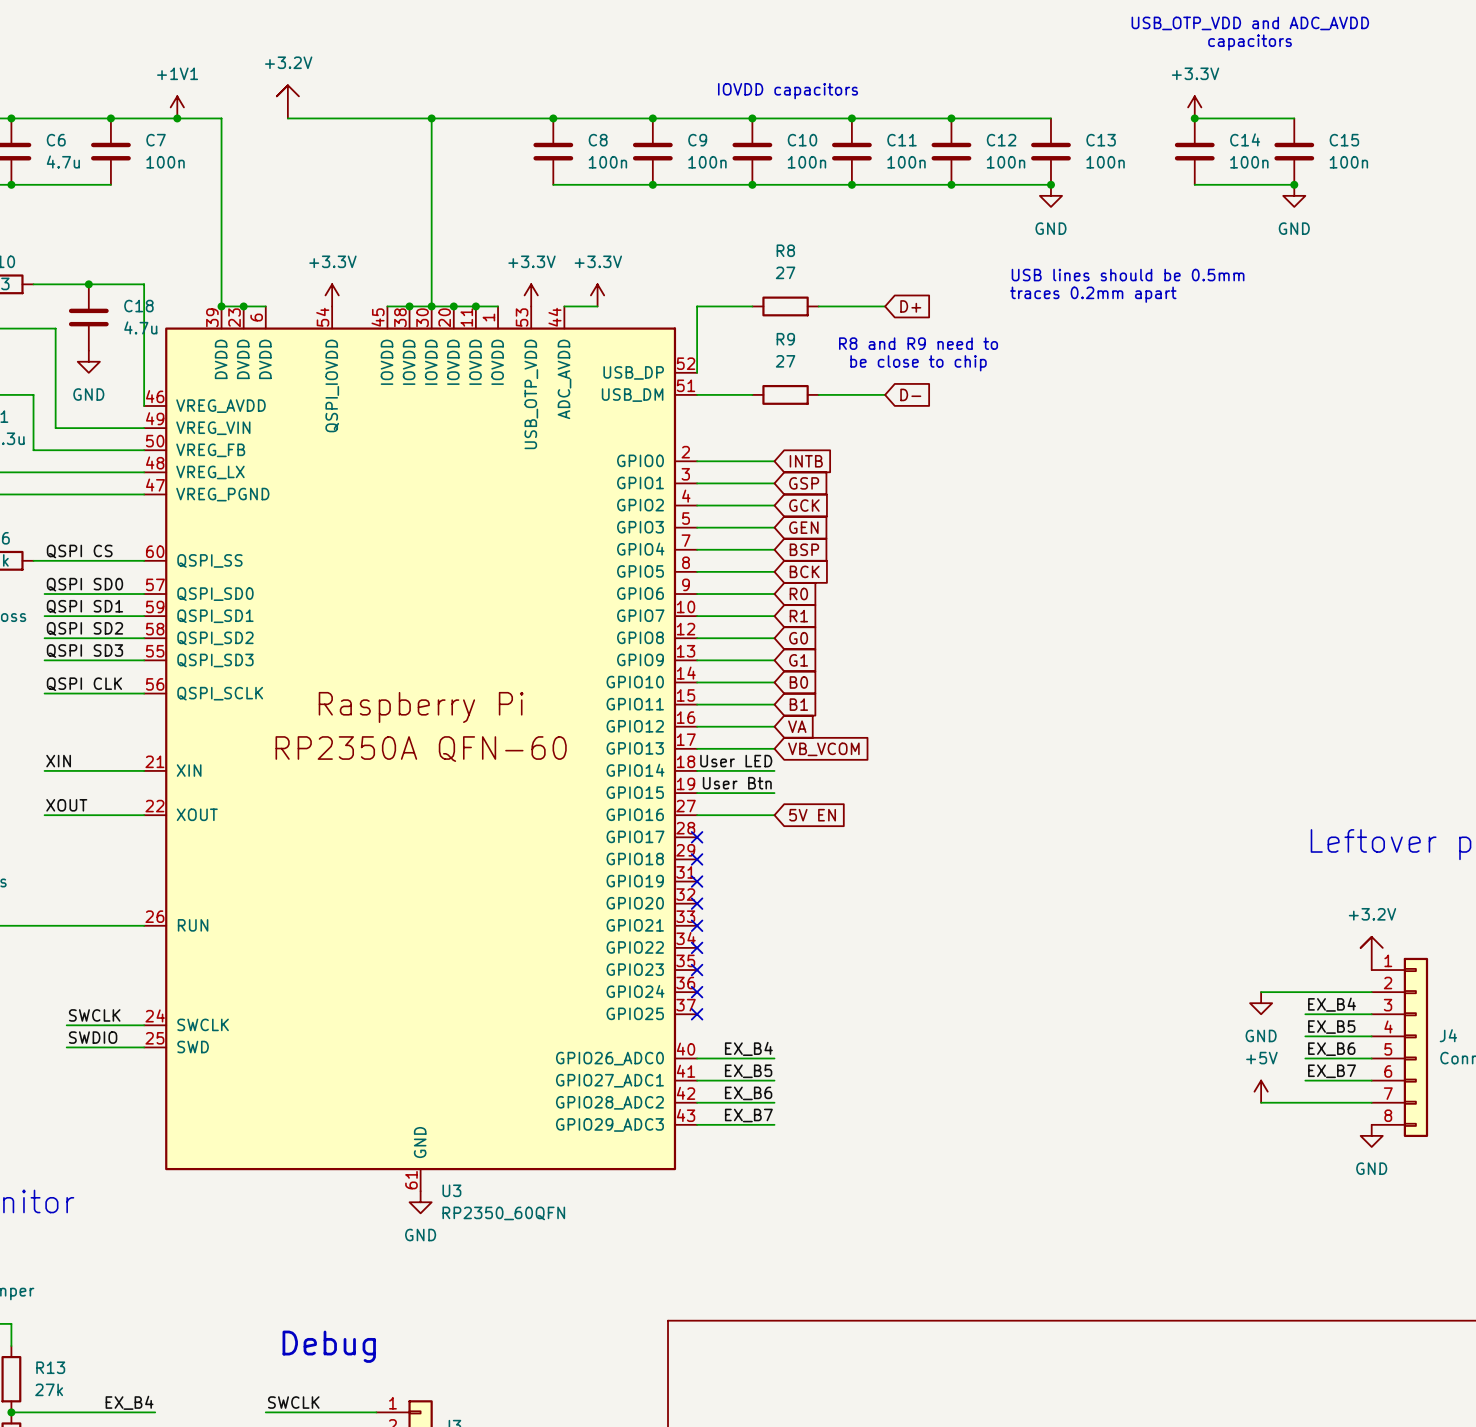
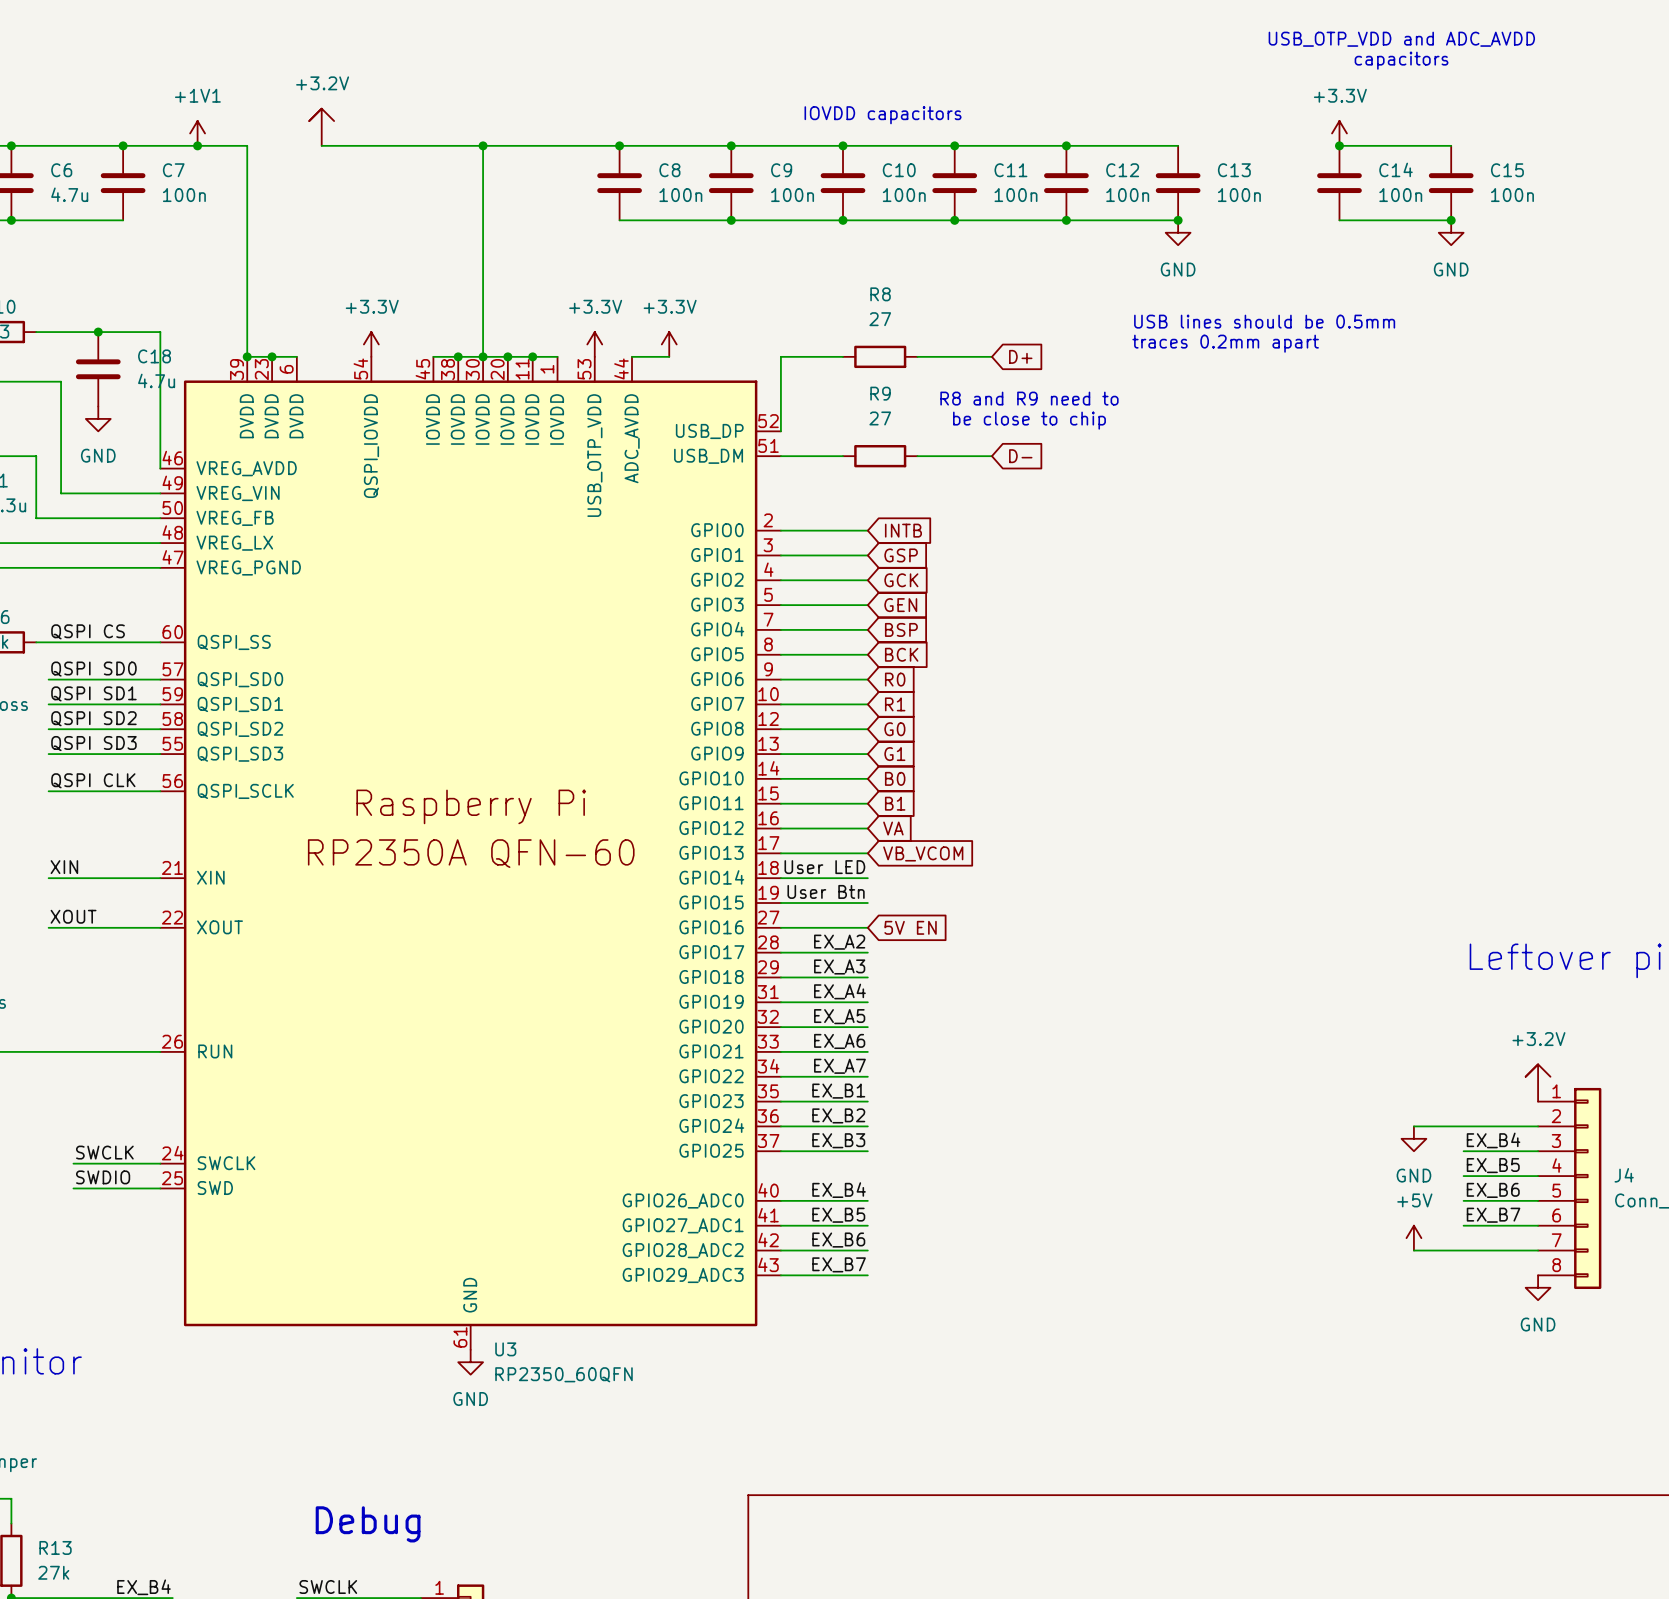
label: none -> EX_A2 (839, 942)
wire: none -> (780, 952) (867, 952)
no-connect mark: (697, 837) -> none
label: none -> EX_A3 (839, 966)
wire: none -> (780, 977) (867, 977)
no-connect mark: (697, 859) -> none
label: none -> EX_A4 (839, 991)
wire: none -> (780, 1002) (867, 1002)
no-connect mark: (697, 881) -> none
label: none -> EX_A5 (839, 1016)
wire: none -> (780, 1027) (867, 1027)
no-connect mark: (697, 903) -> none
label: none -> EX_A6 (839, 1041)
wire: none -> (780, 1051) (867, 1051)
no-connect mark: (697, 925) -> none
label: none -> EX_A7 (839, 1066)
wire: none -> (780, 1076) (867, 1076)
no-connect mark: (697, 947) -> none
label: none -> EX_B1 (838, 1091)
wire: none -> (780, 1101) (867, 1101)
no-connect mark: (697, 970) -> none
label: none -> EX_B2 (838, 1115)
wire: none -> (780, 1126) (867, 1126)
no-connect mark: (697, 992) -> none
label: none -> EX_B3 (838, 1140)
wire: none -> (780, 1151) (867, 1151)
no-connect mark: (697, 1014) -> none

